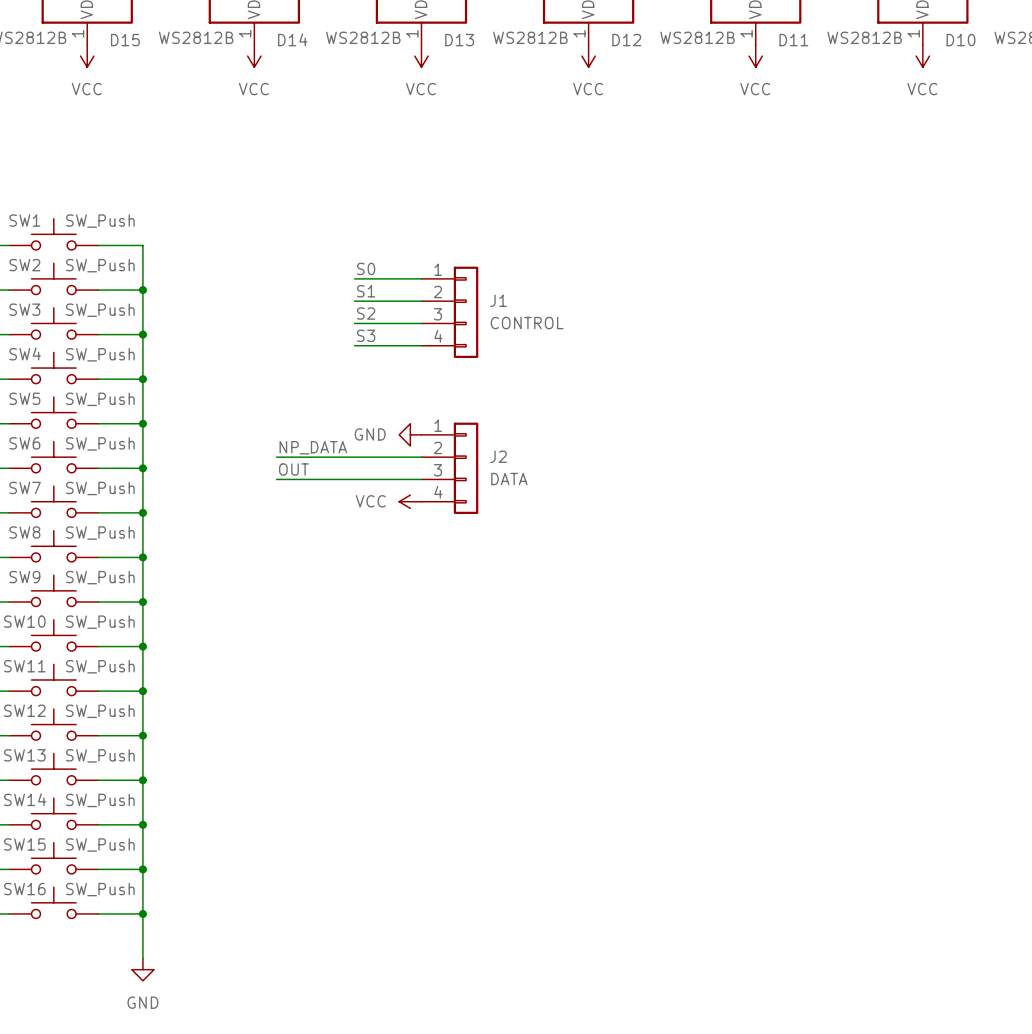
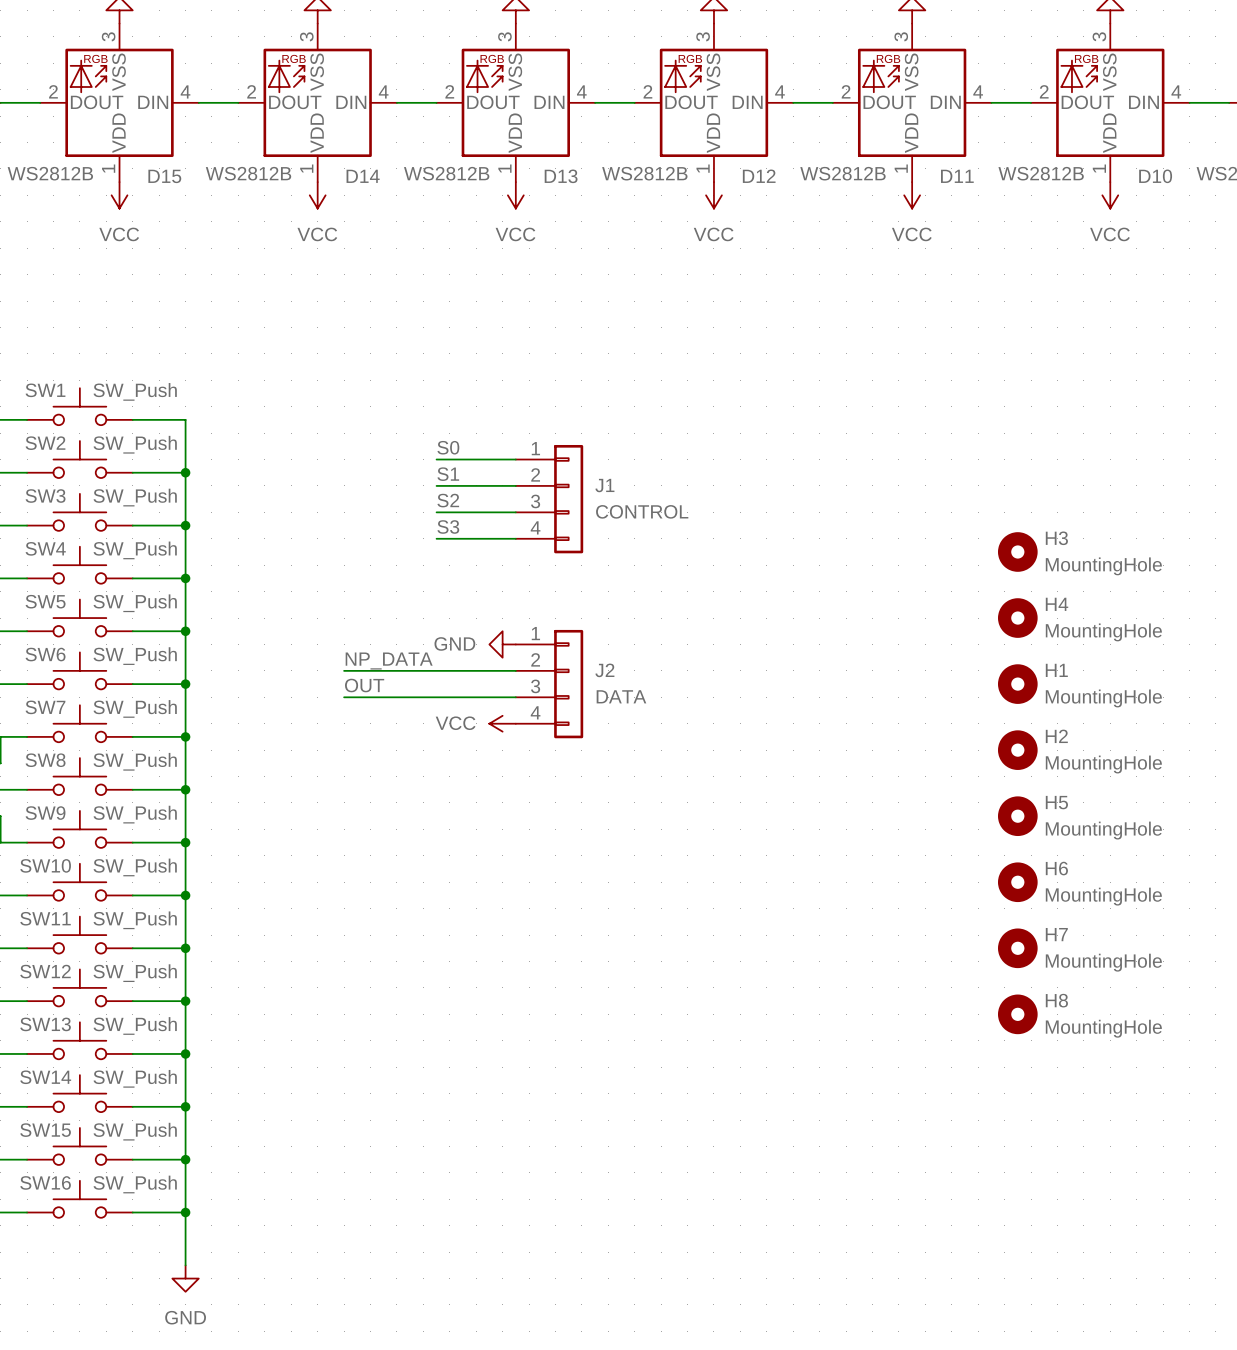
H3: none -> MountingHole (1017, 551)
H4: none -> MountingHole (1017, 618)
H1: none -> MountingHole (1017, 684)
H2: none -> MountingHole (1017, 750)
H5: none -> MountingHole (1017, 816)
H6: none -> MountingHole (1017, 882)
H7: none -> MountingHole (1017, 948)
H8: none -> MountingHole (1017, 1014)

